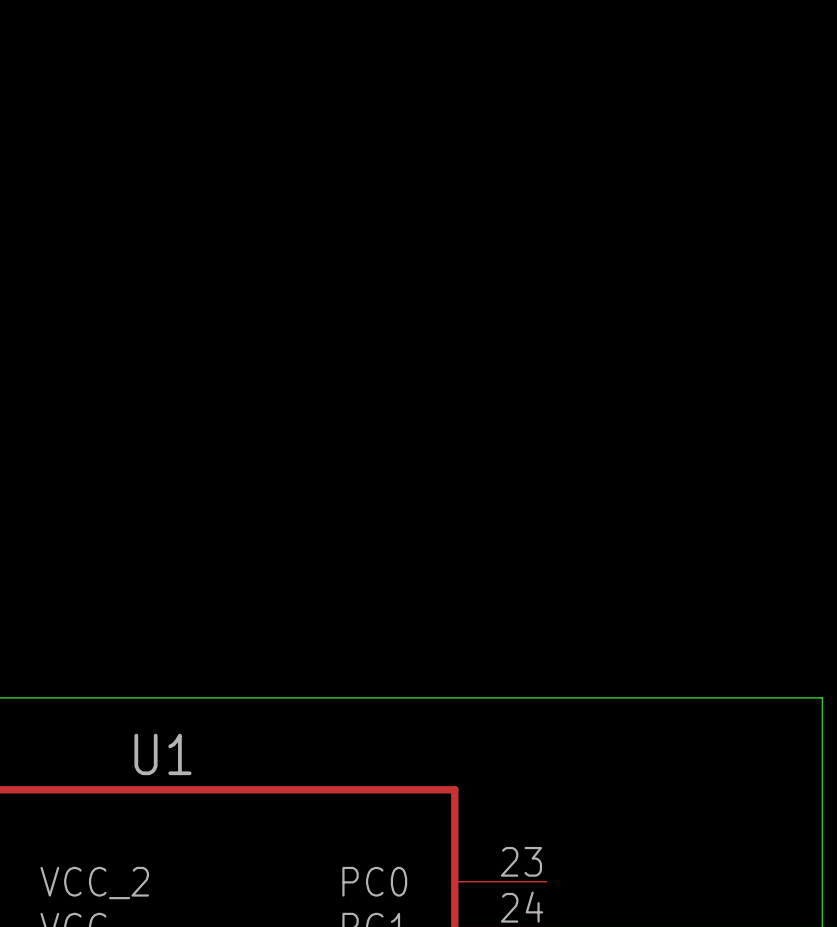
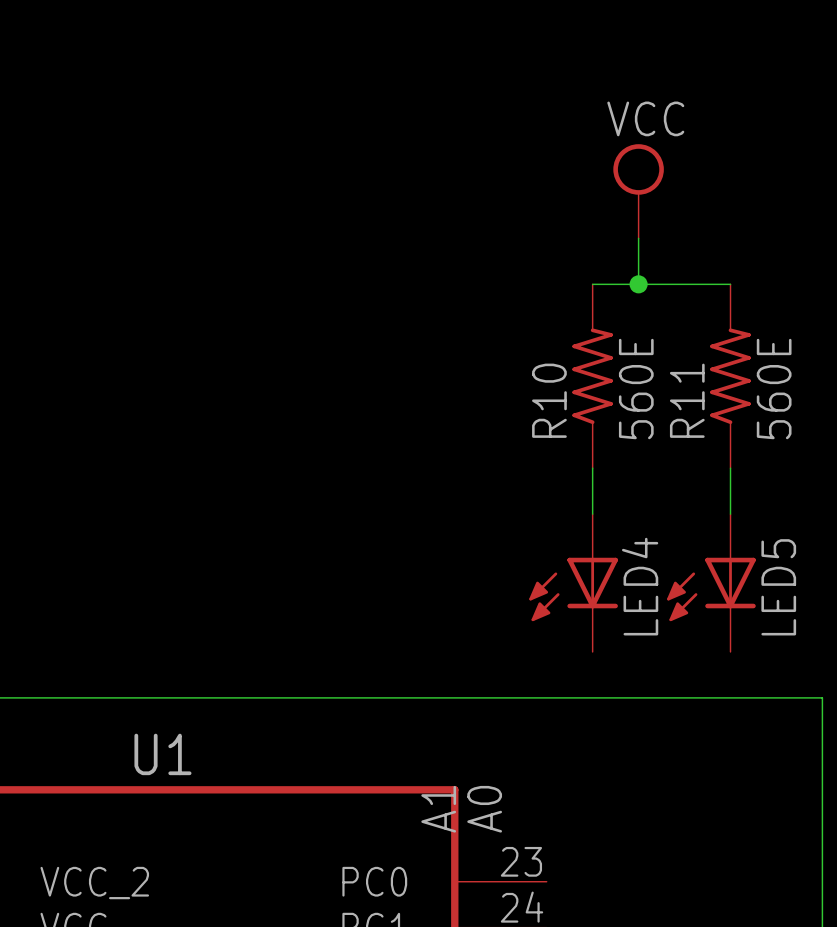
power symbol: none -> VCC (638, 191)
wire: none -> (638, 238) (638, 284)
wire: none -> (592, 284) (730, 284)
junction: none -> (638, 284)
R10: none -> 560E (592, 376)
R11: none -> 560E (730, 376)
wire: none -> (592, 468) (592, 514)
wire: none -> (730, 468) (730, 514)
LED4: none -> (573, 583)
LED5: none -> (711, 583)
label: none -> A1 (438, 809)
label: none -> A0 (484, 809)

